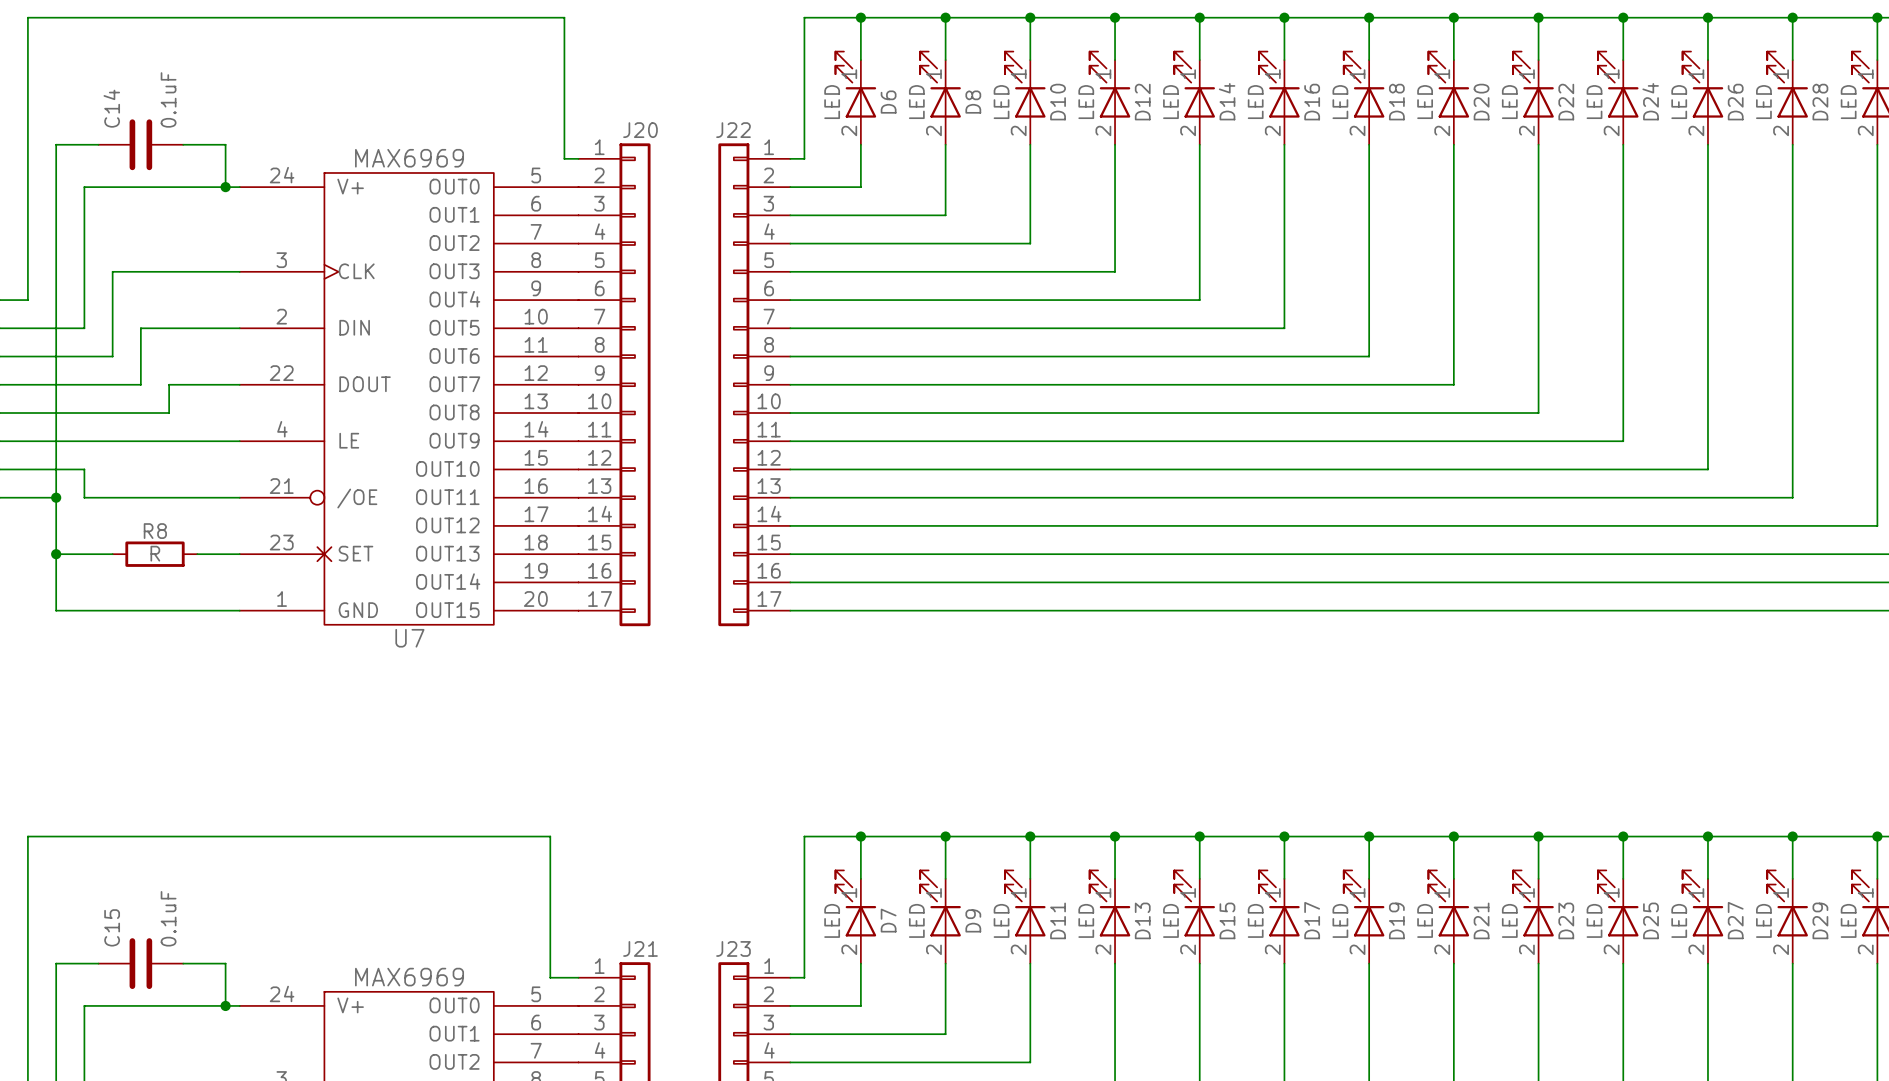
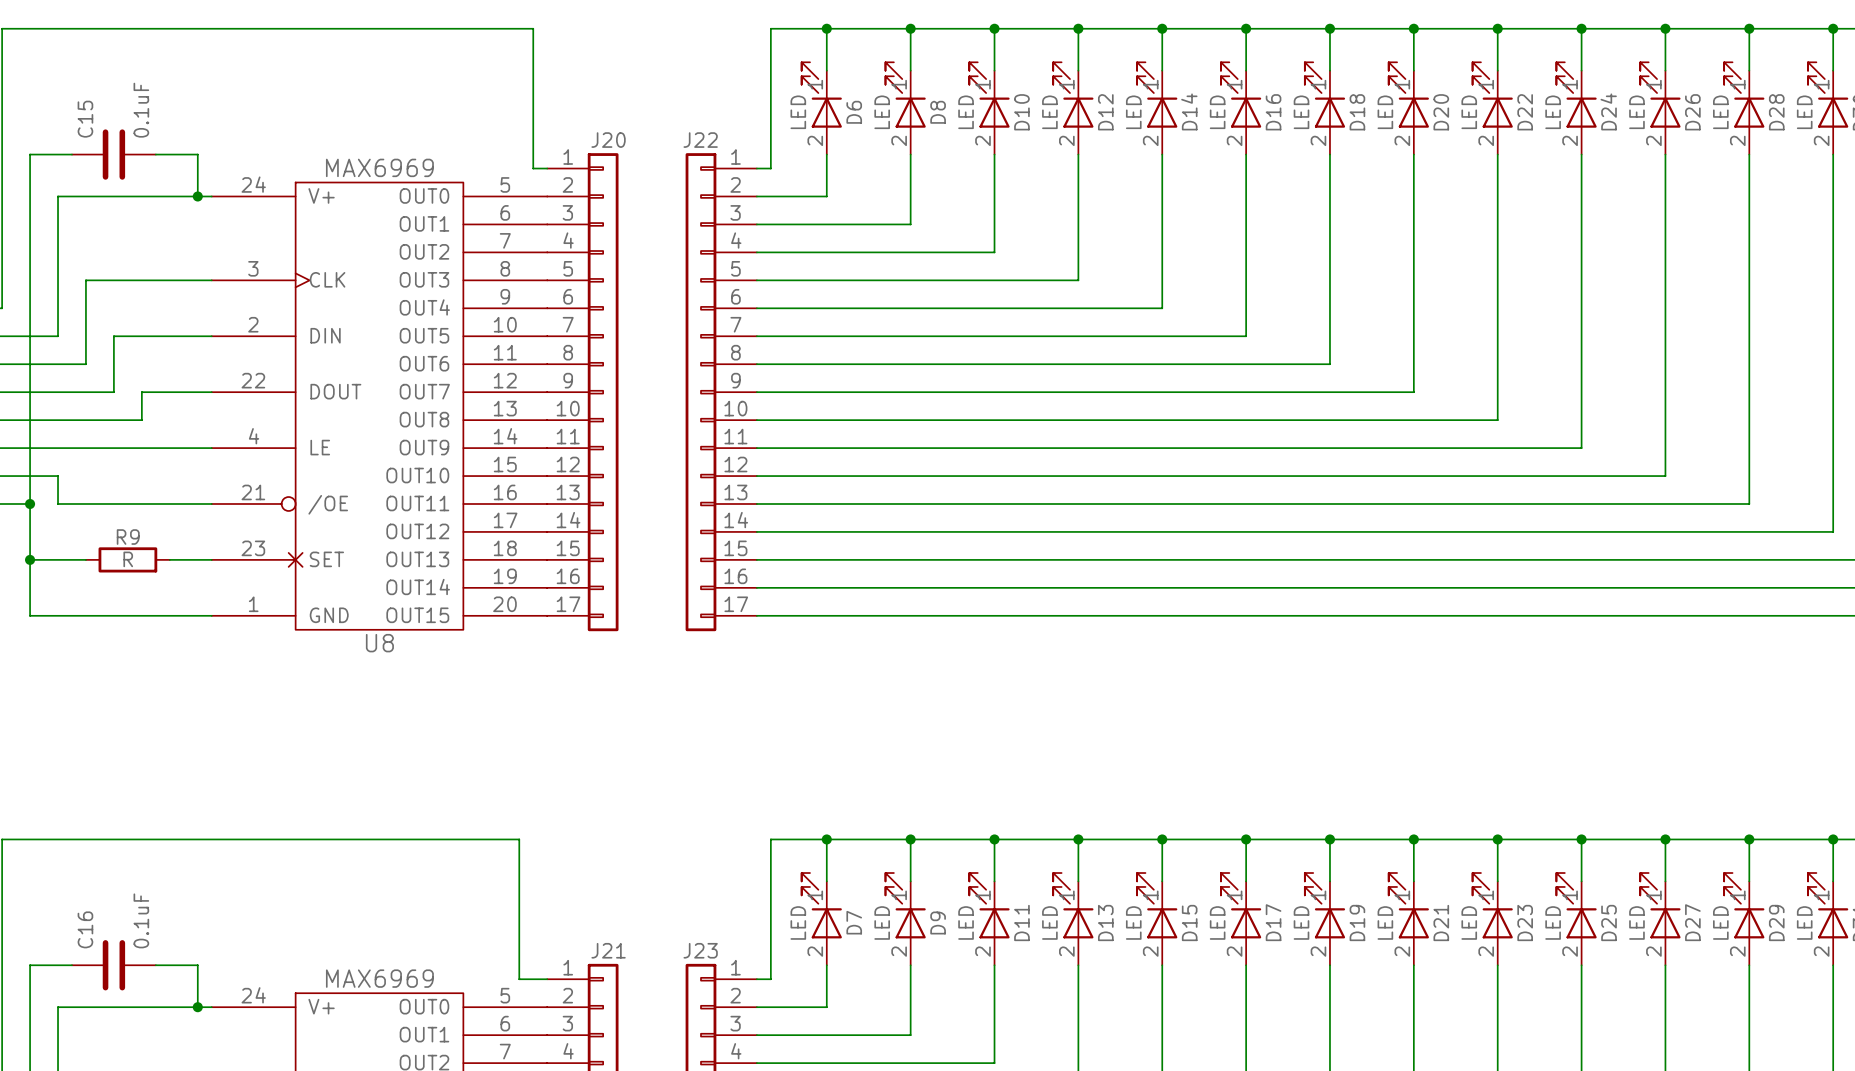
C14 name: C14 (111, 108) -> C15 (85, 119)
R8 name: R8 (155, 531) -> R9 (128, 537)
U7 name: U7 (409, 638) -> U8 (379, 643)
C15 name: C15 (112, 927) -> C16 (85, 929)

